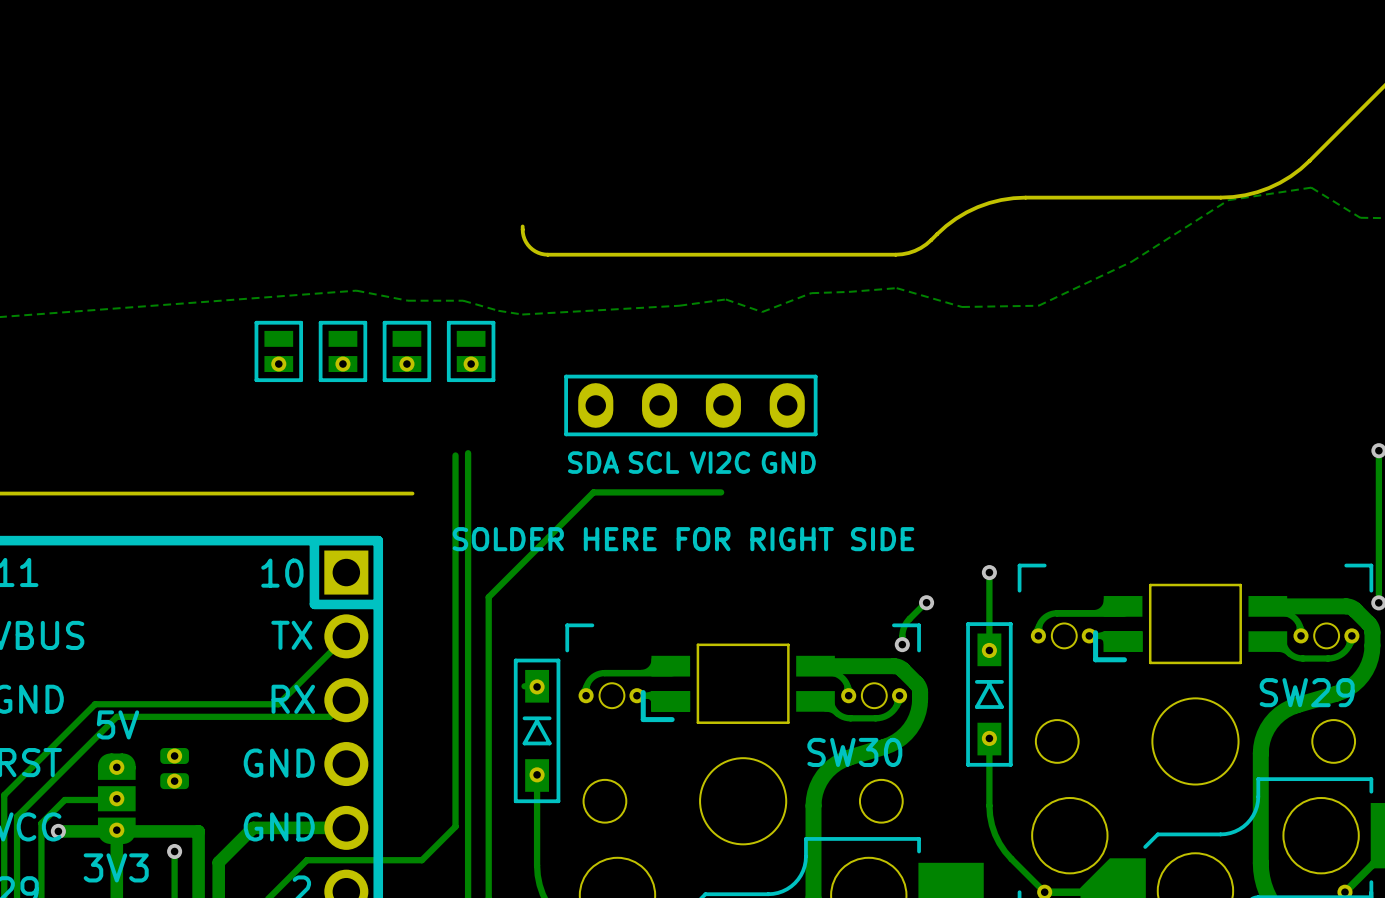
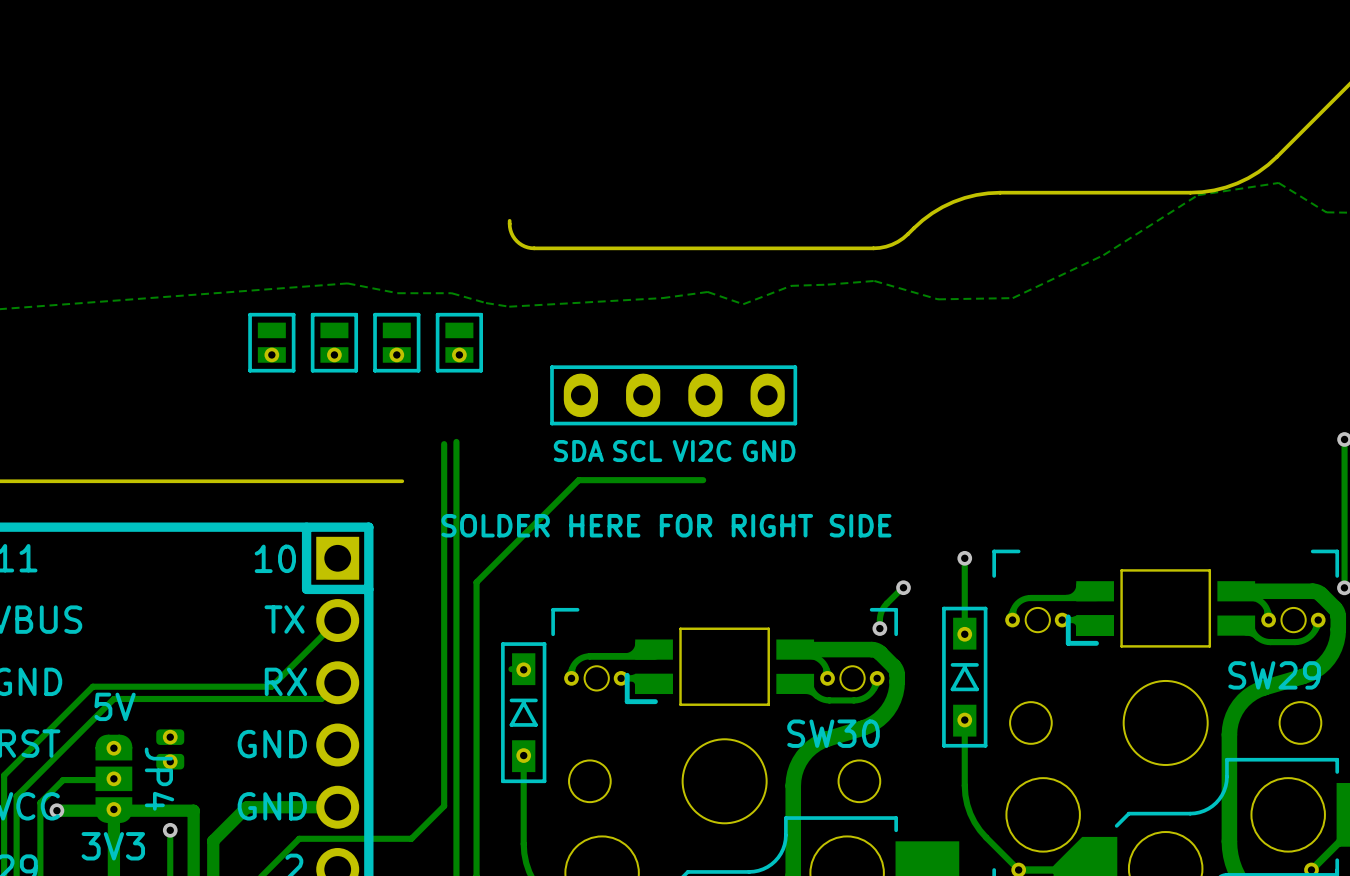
part text: none -> JP4 (159, 779)

